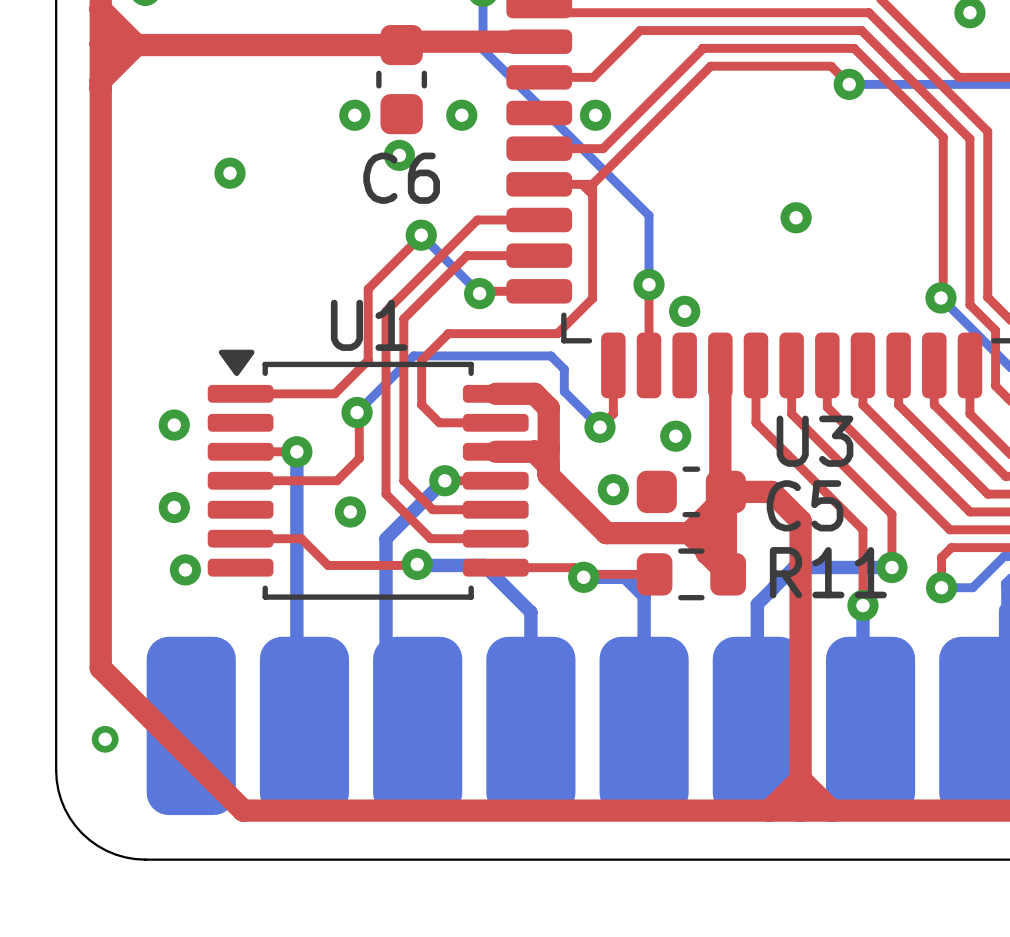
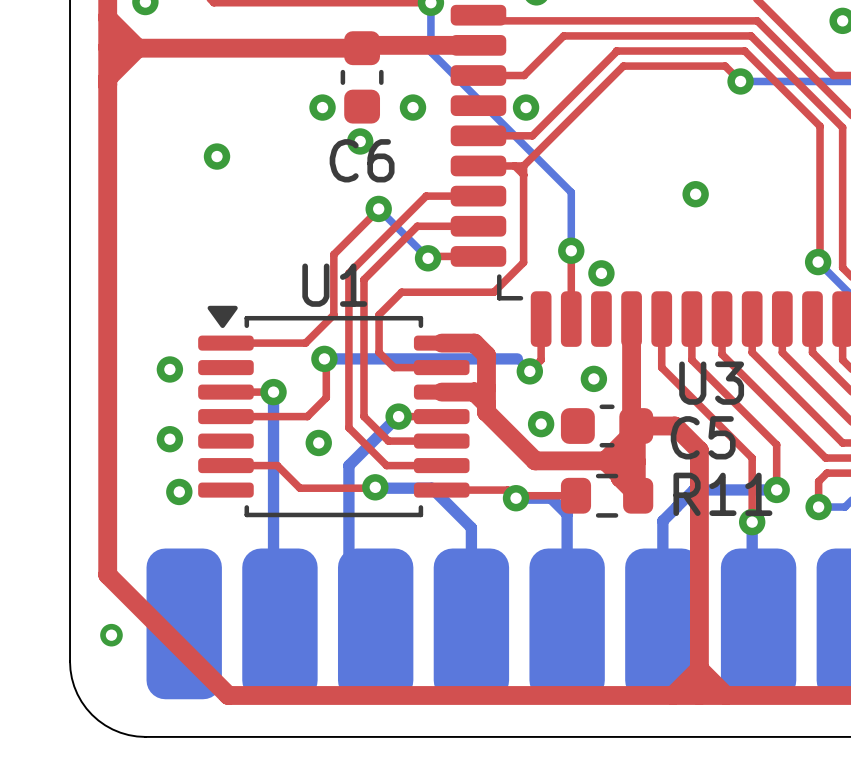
bottom track: (357, 412) (413, 355) (550, 355) (564, 369) (564, 391) (585, 412) -> (324, 358) (517, 358)

